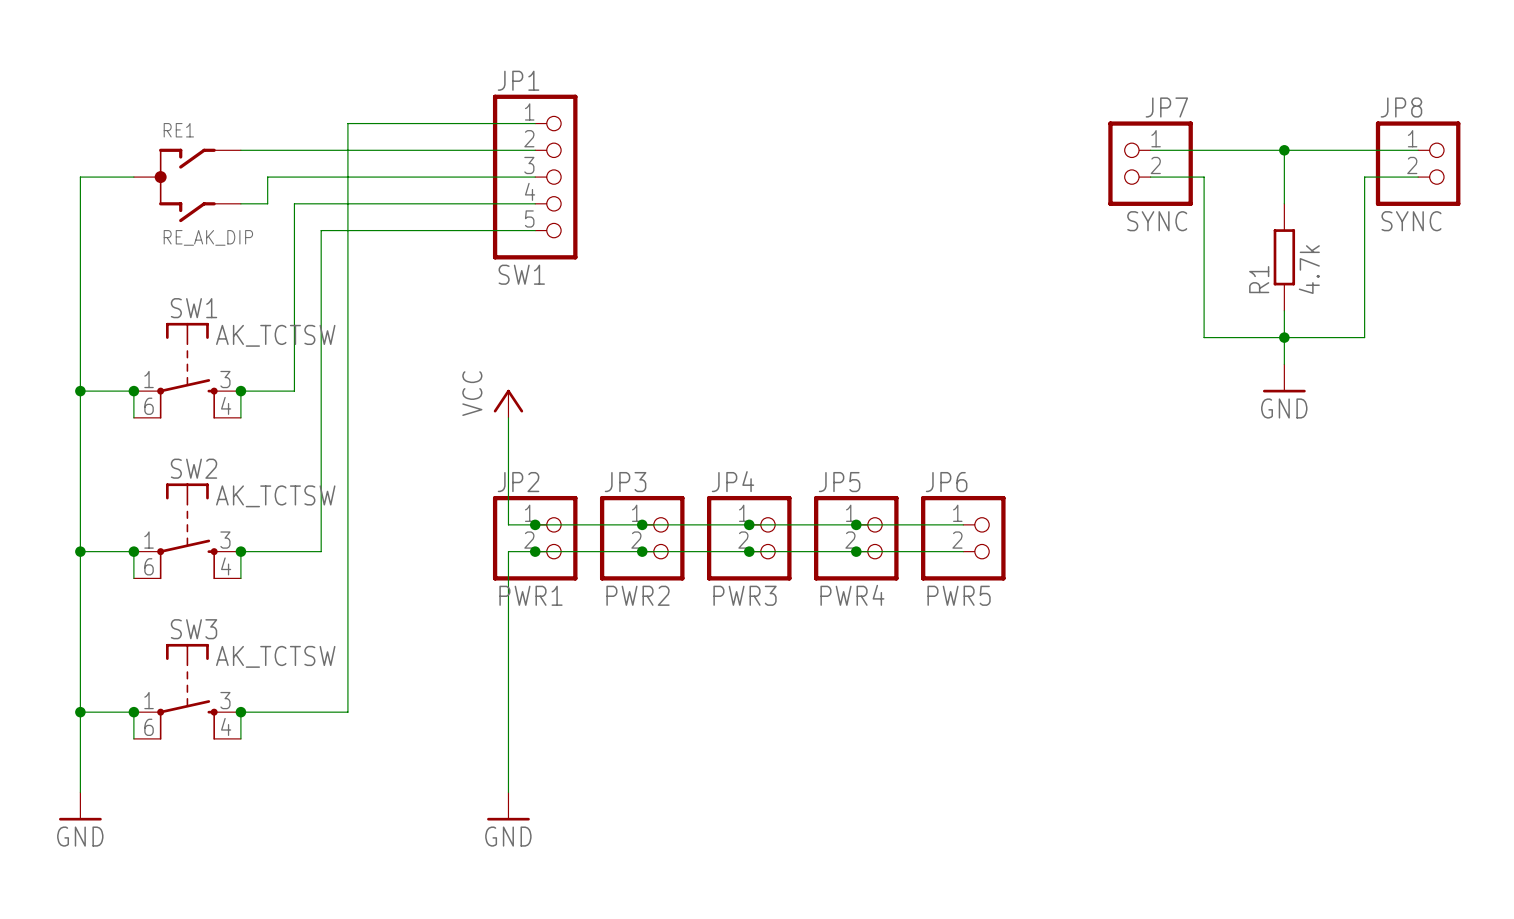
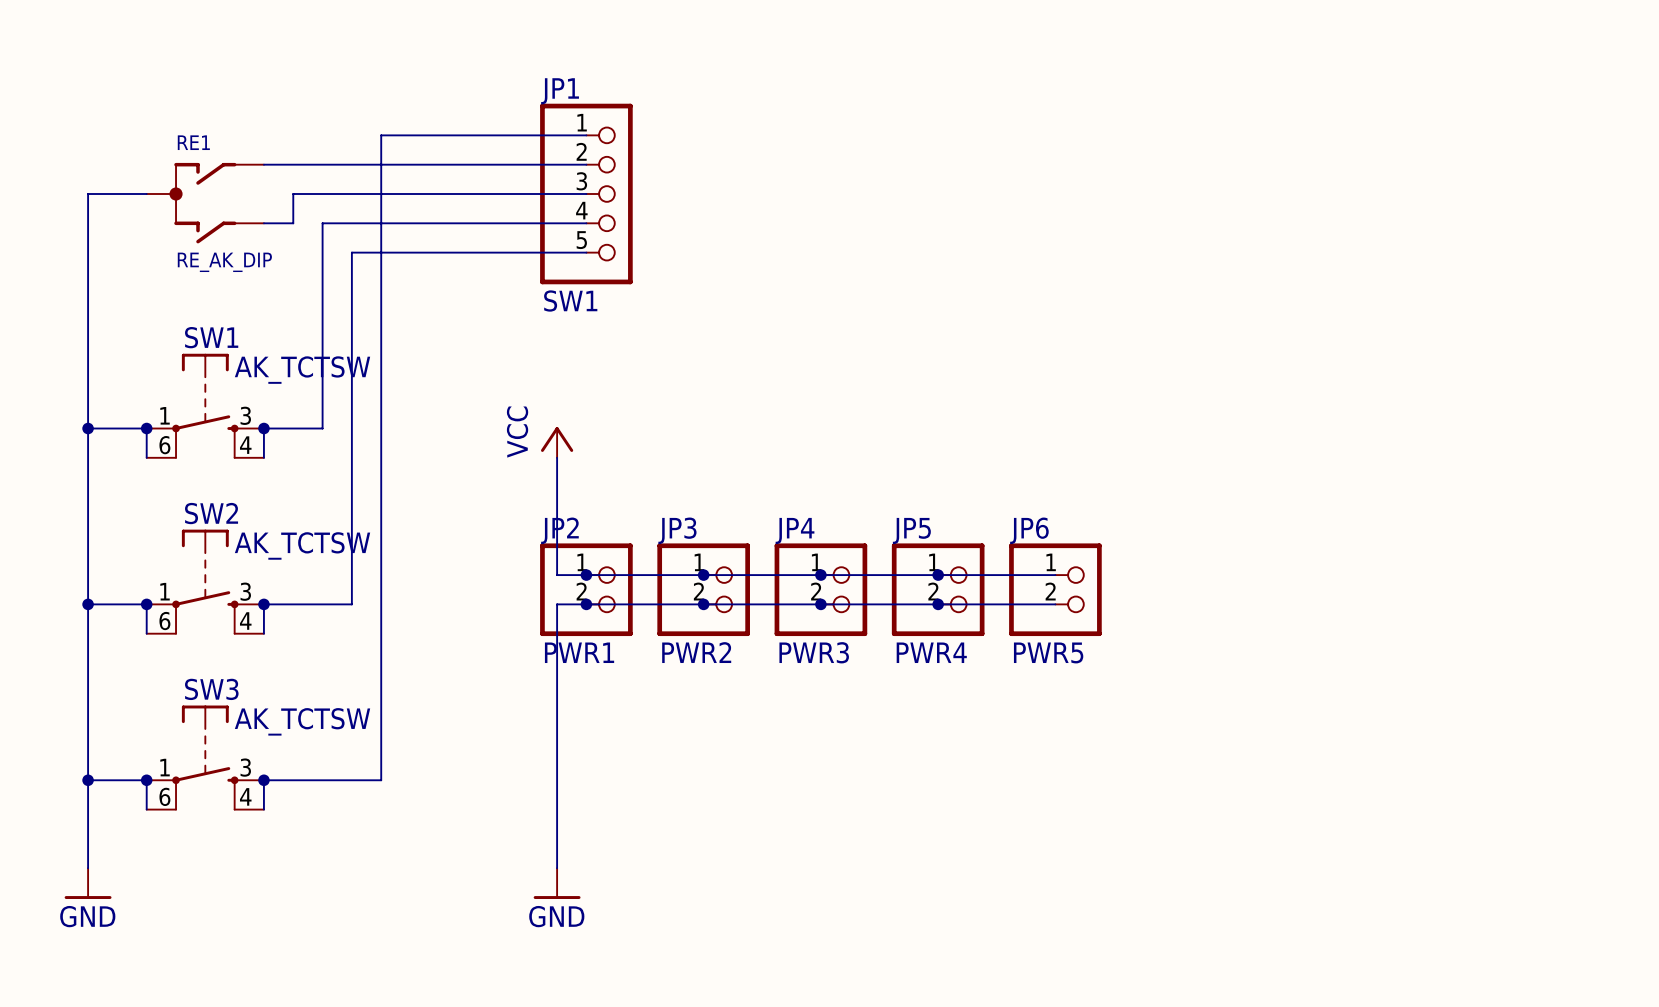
wire: (1150, 150) (1418, 150) -> none
wire: (1284, 150) (1284, 203) -> none
junction: (1284, 150) -> none
JP7: SYNC (1150, 163) -> none
JP8: SYNC (1418, 163) -> none
wire: (1150, 177) (1204, 177) (1204, 337) (1364, 337) (1364, 177) (1418, 177) -> none
R1: 4.7k (1284, 257) -> none
wire: (1284, 310) (1284, 364) -> none
junction: (1284, 337) -> none
power symbol: GND (1284, 378) -> none

